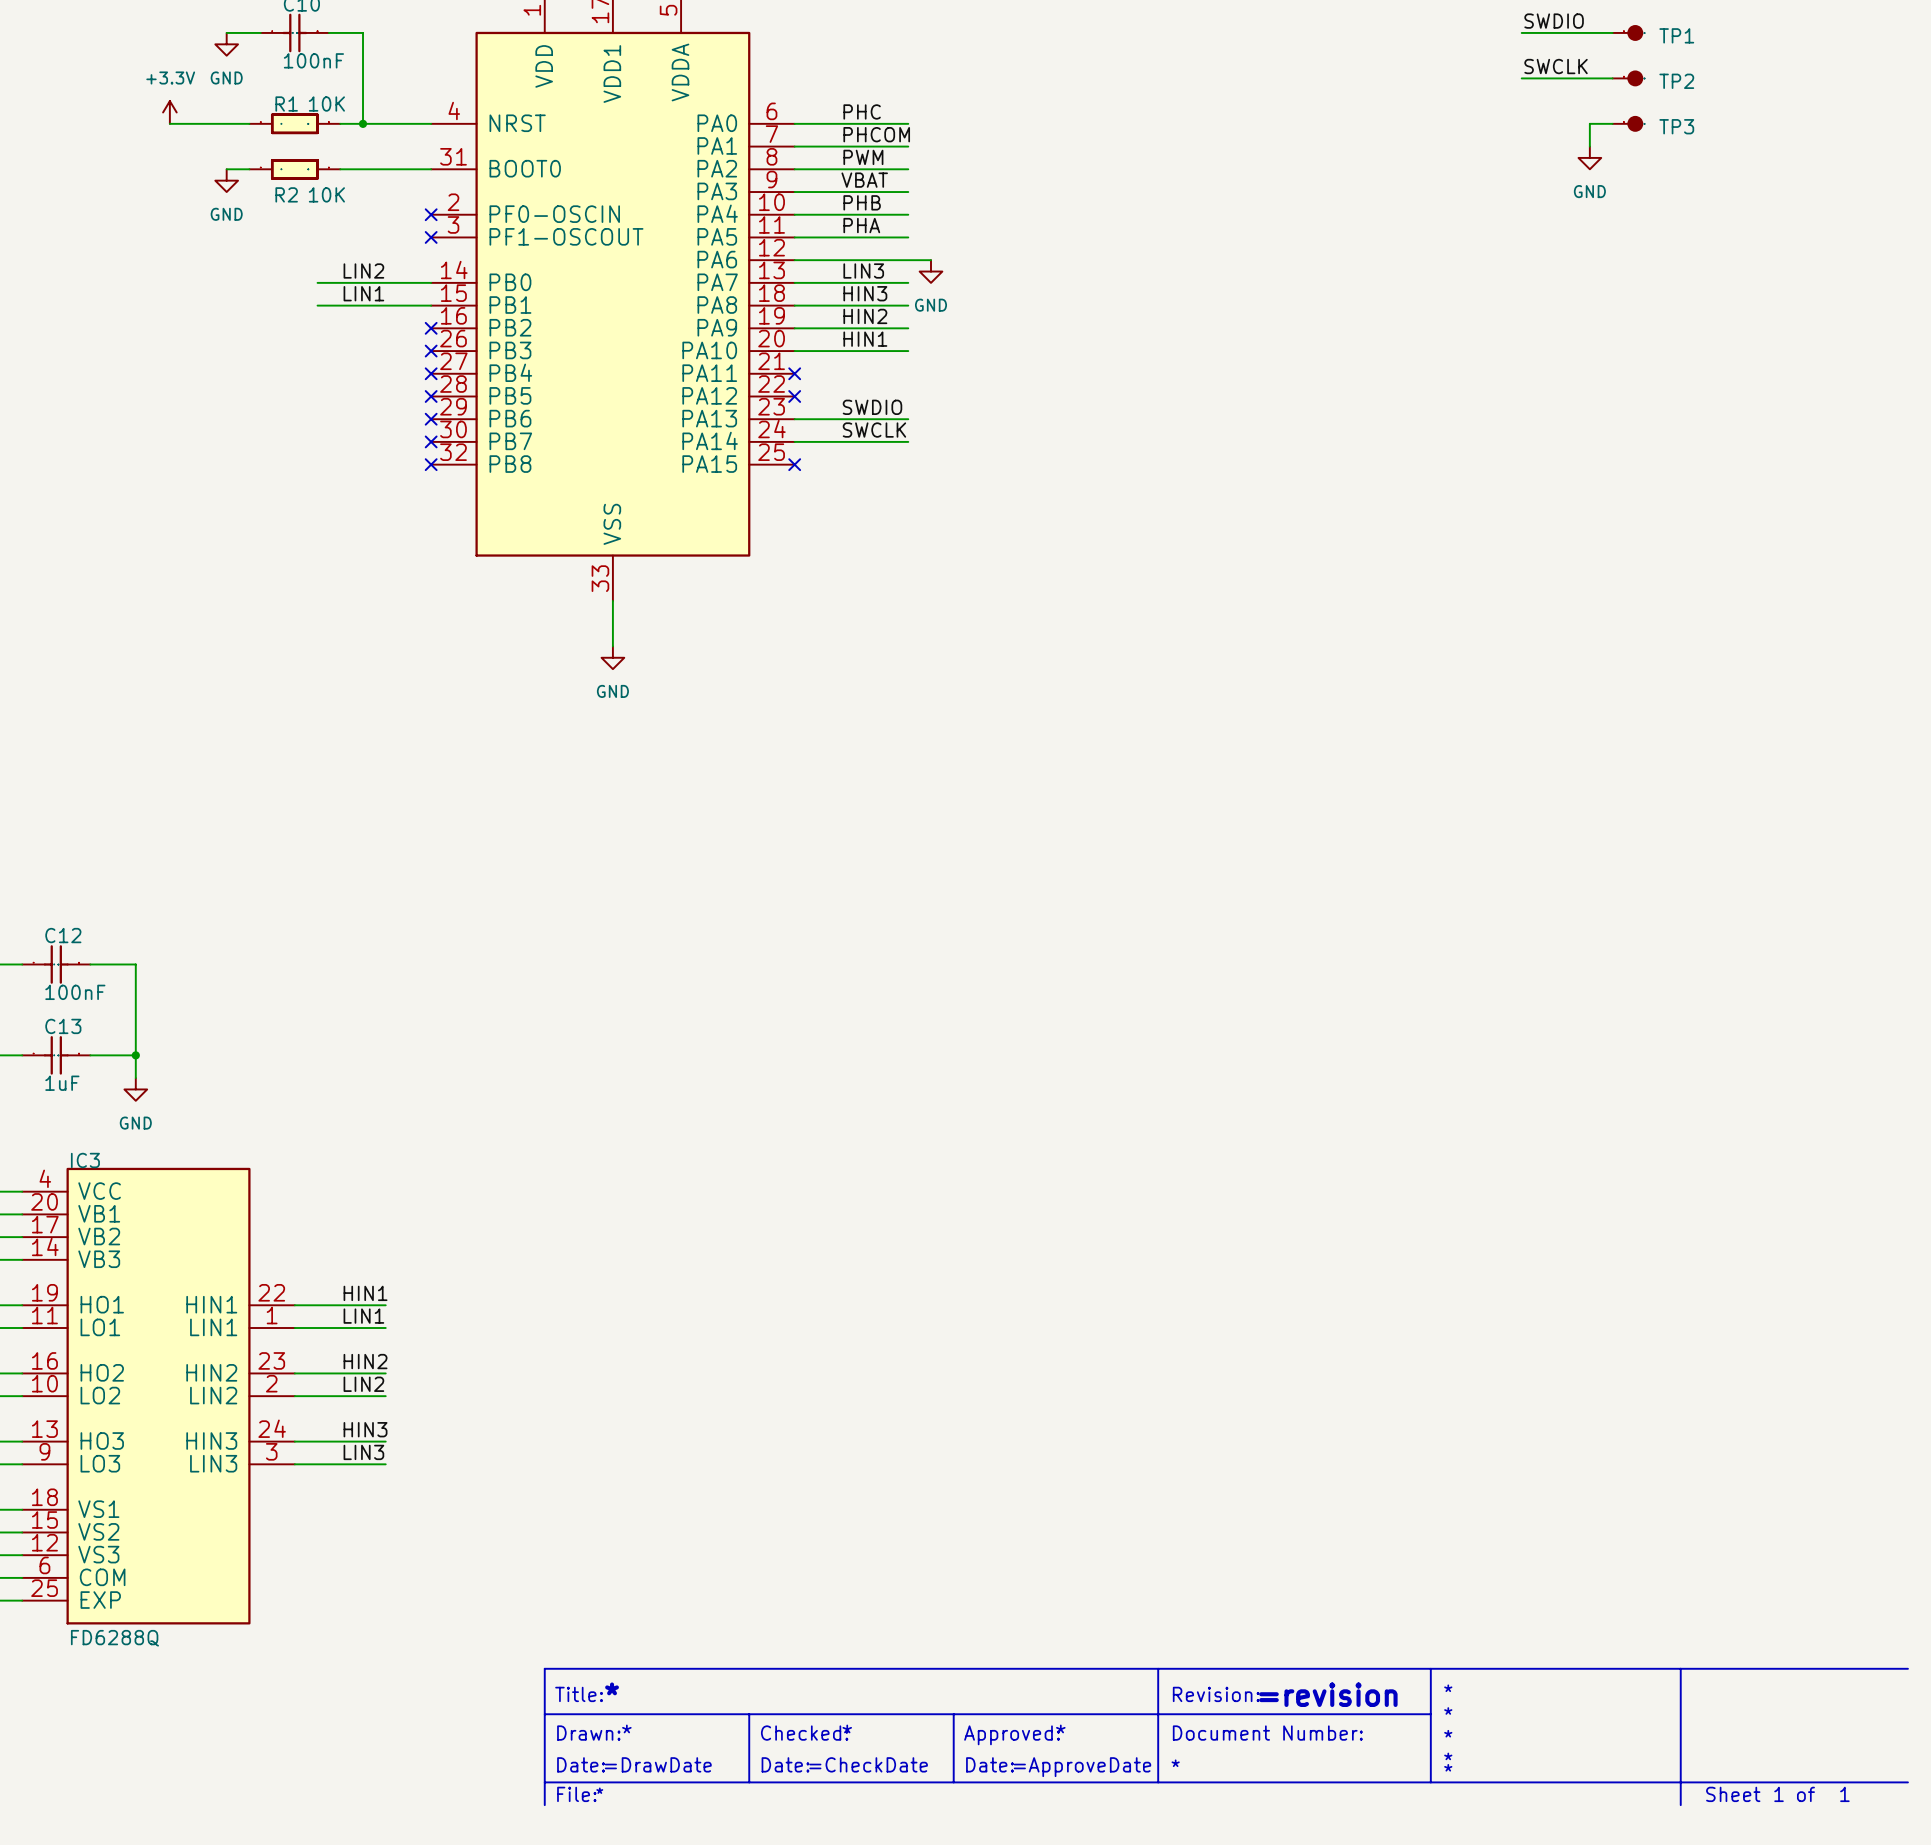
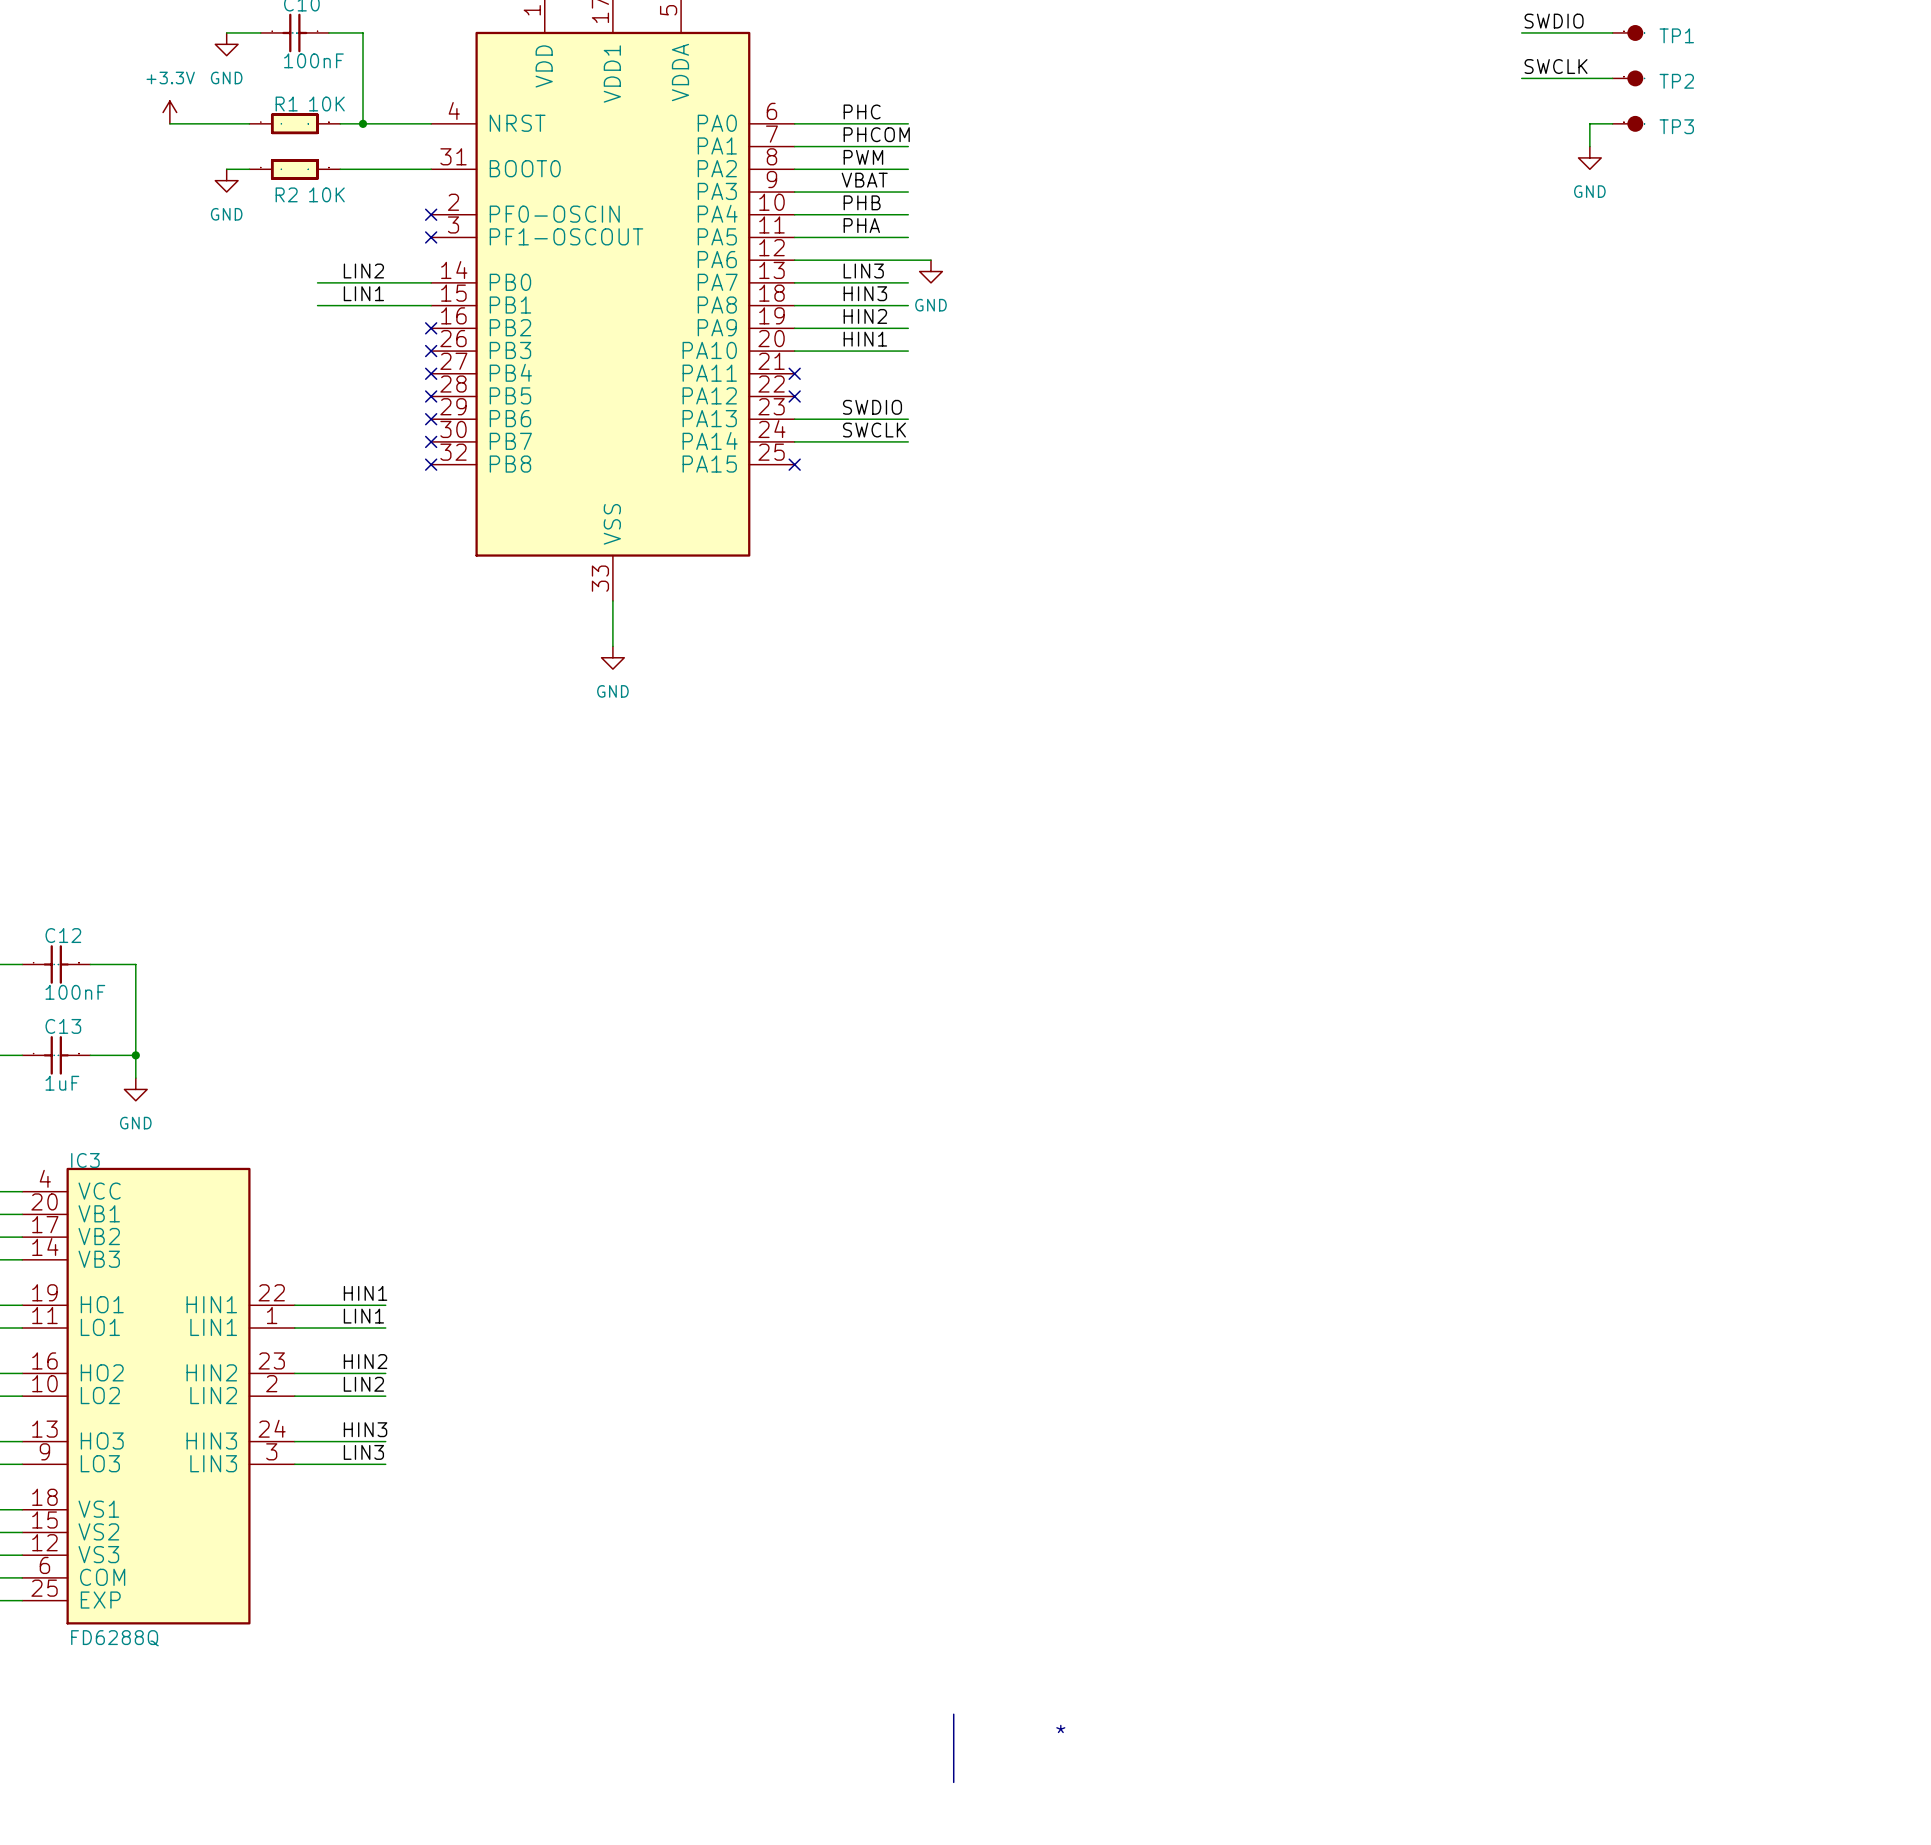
line: (1158, 1668) (1158, 1782) -> none
line: (1430, 1668) (1430, 1782) -> none
line: (1680, 1668) (1680, 1805) -> none
line: (1907, 1668) (544, 1668) (544, 1805) -> none
text: * (612, 1688) -> none
text: * (1448, 1688) -> none
text: Title: (579, 1694) -> none
text: Revision: (1216, 1694) -> none
text: =revision (1328, 1694) -> none
text: * (1448, 1710) -> none
line: (544, 1714) (1430, 1714) -> none
line: (749, 1714) (749, 1782) -> none
text: * (626, 1728) -> none
text: * (847, 1728) -> none
text: Drawn: (588, 1733) -> none
text: Checked: (804, 1733) -> none
text: Document Number: (1267, 1733) -> none
text: * (1448, 1733) -> none
text: Approved: (1012, 1735) -> none
text: * (1448, 1756) -> none
text: * (1175, 1763) -> none
text: Date: (581, 1764) -> none
text: =DrawDate (658, 1764) -> none
text: Date: (785, 1764) -> none
text: =CheckDate (868, 1764) -> none
text: Date: (989, 1764) -> none
text: =ApproveDate (1082, 1767) -> none
text: * (1448, 1767) -> none
line: (544, 1782) (1907, 1782) -> none
text: * (599, 1790) -> none
text: File: (576, 1794) -> none
text: Sheet (1733, 1794) -> none
text: 1 (1779, 1794) -> none
text: of (1805, 1794) -> none
text: 1 (1844, 1794) -> none

